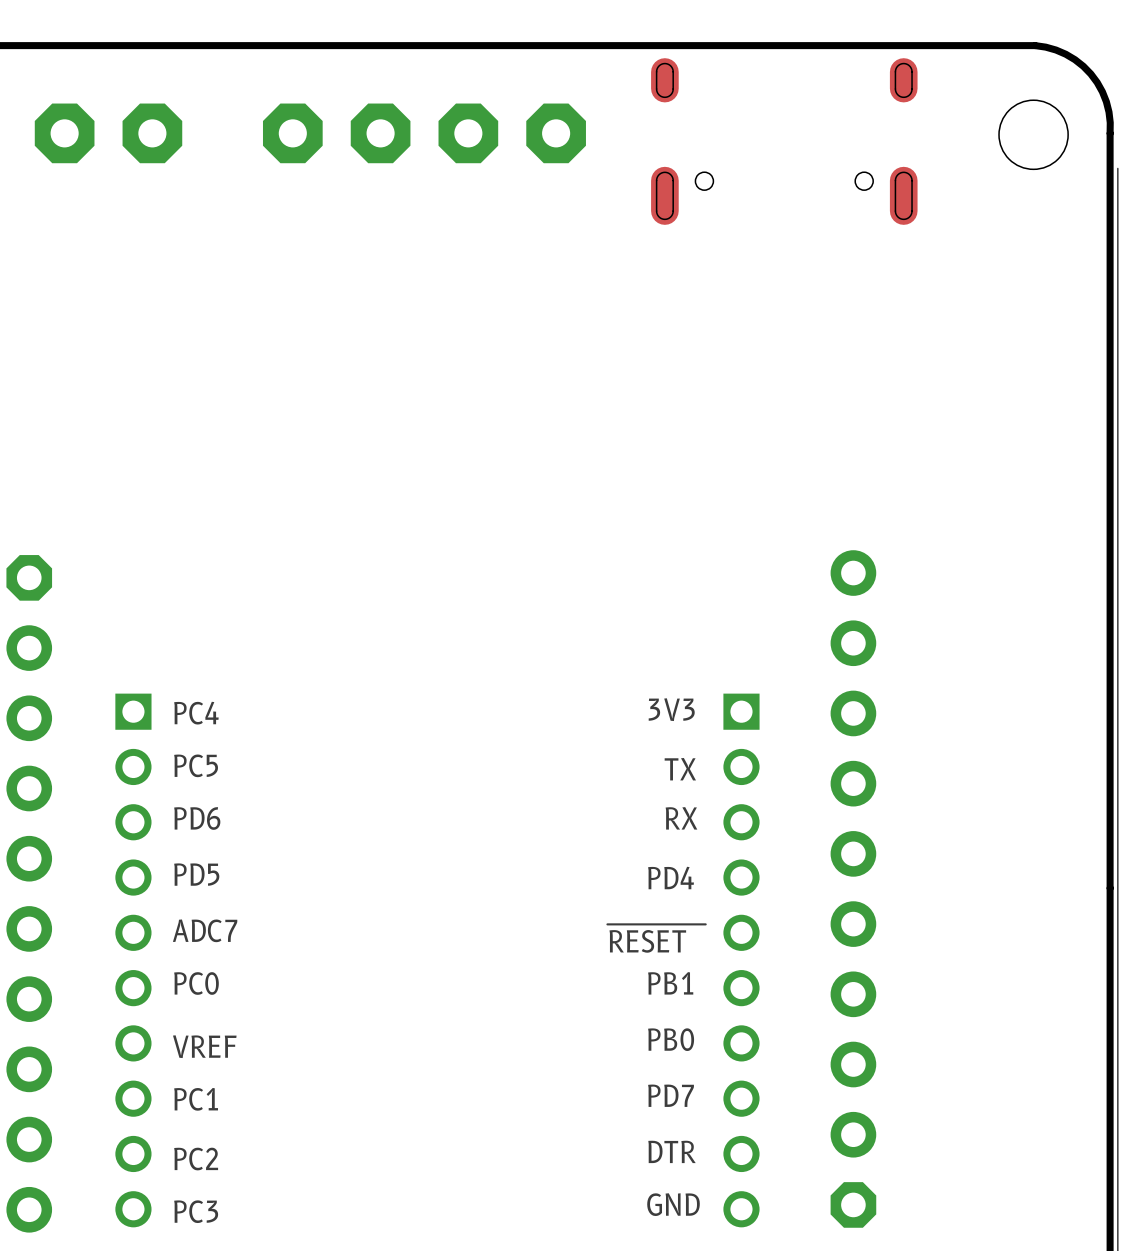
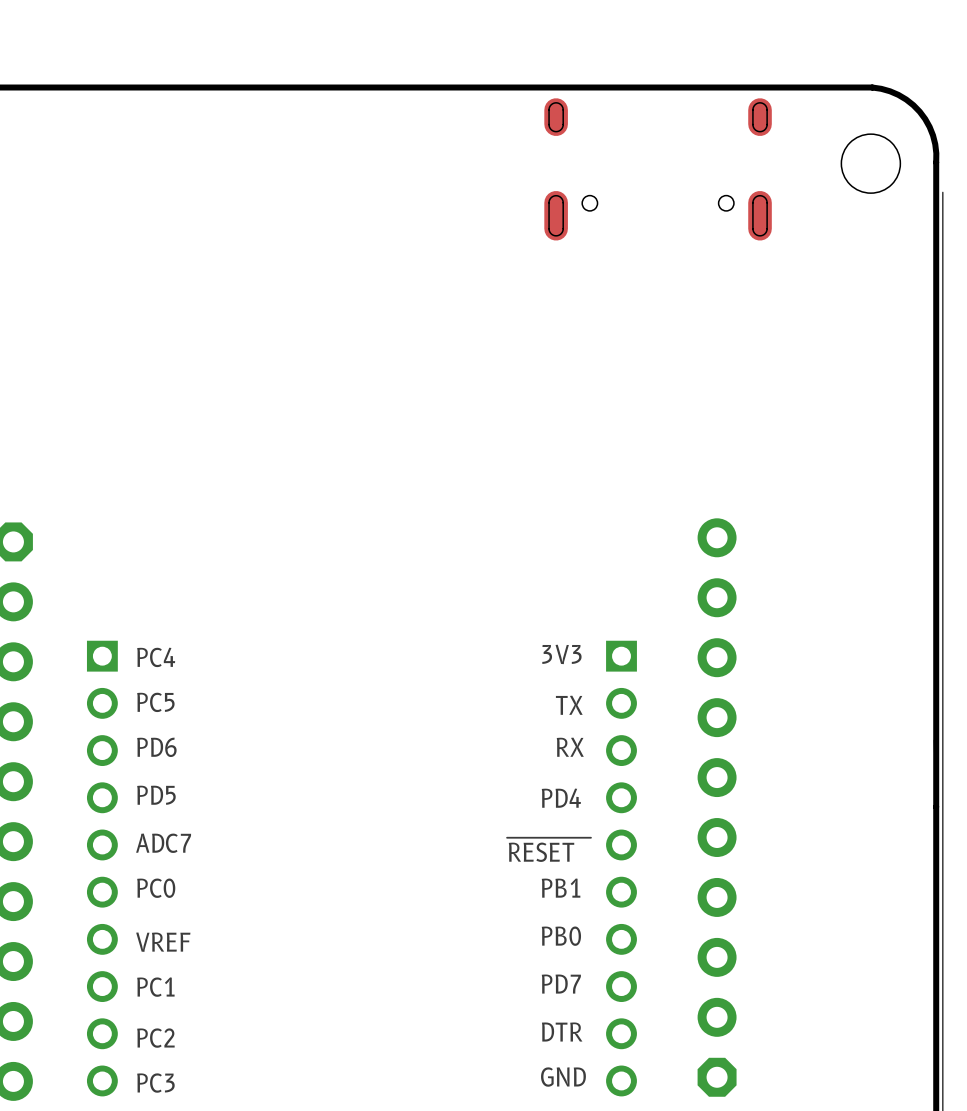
part: (64, 133) -> none
part: (152, 133) -> none
part: (292, 133) -> none
part: (380, 133) -> none
part: (468, 133) -> none
part: (556, 133) -> none

